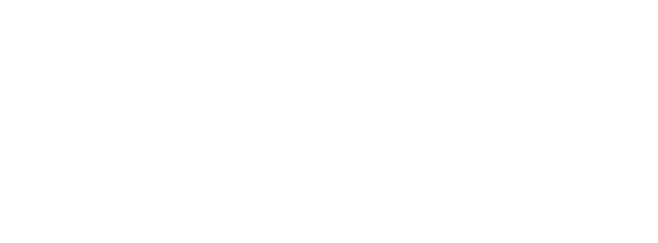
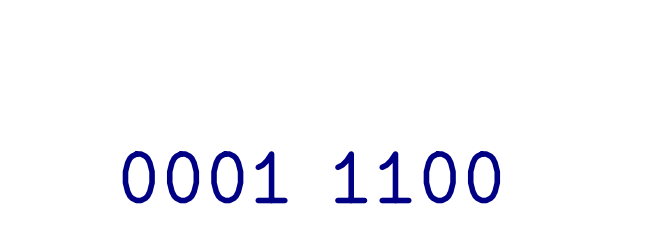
text: none -> 0001 1100 (311, 177)

